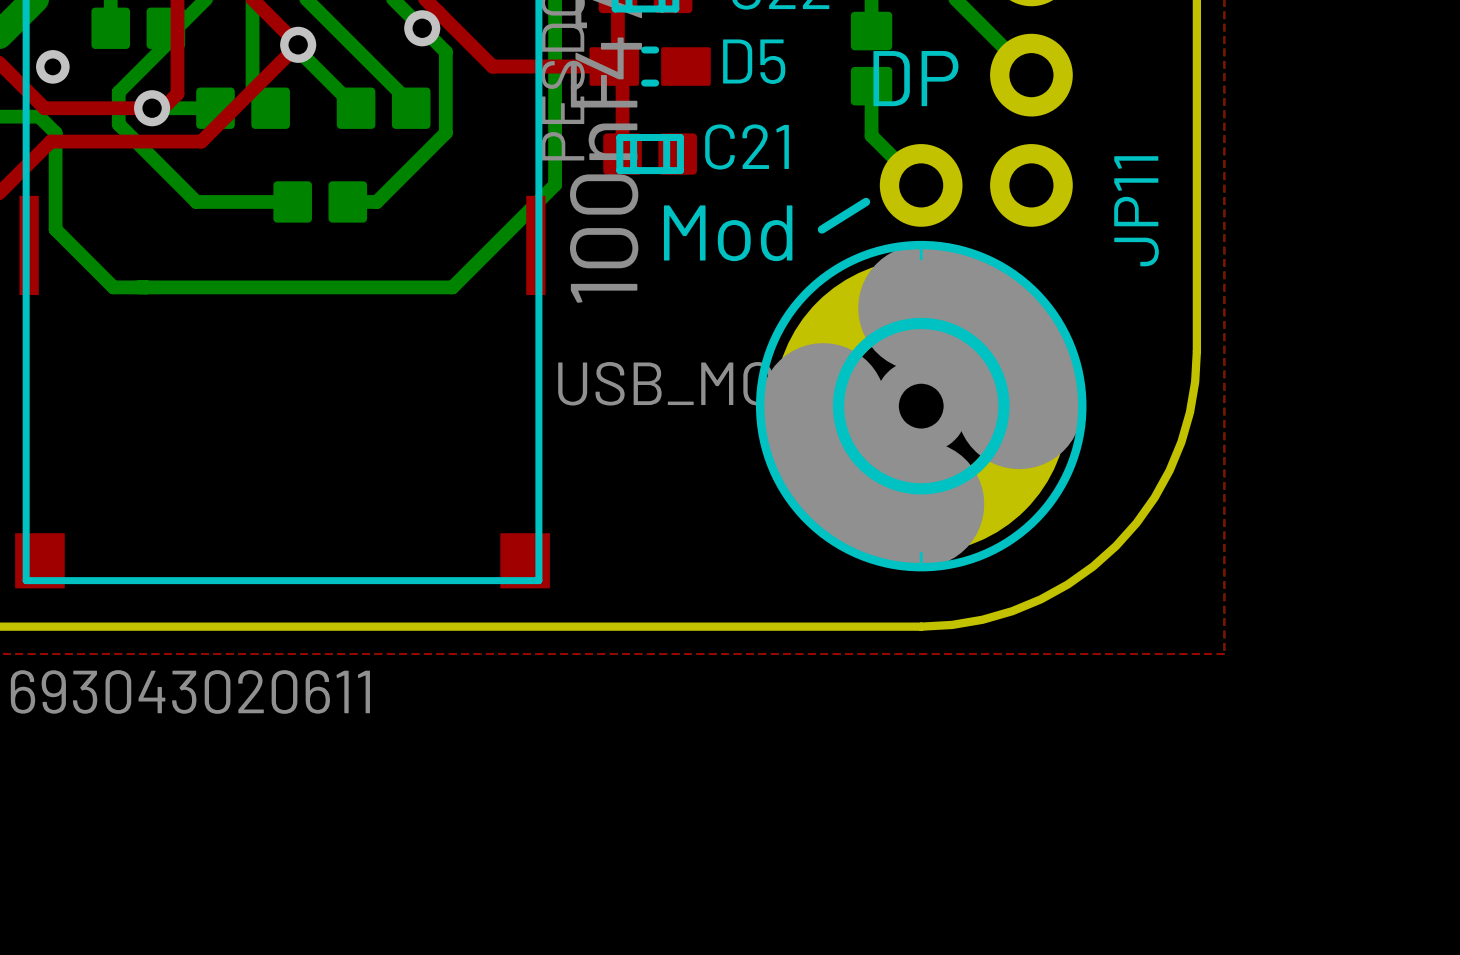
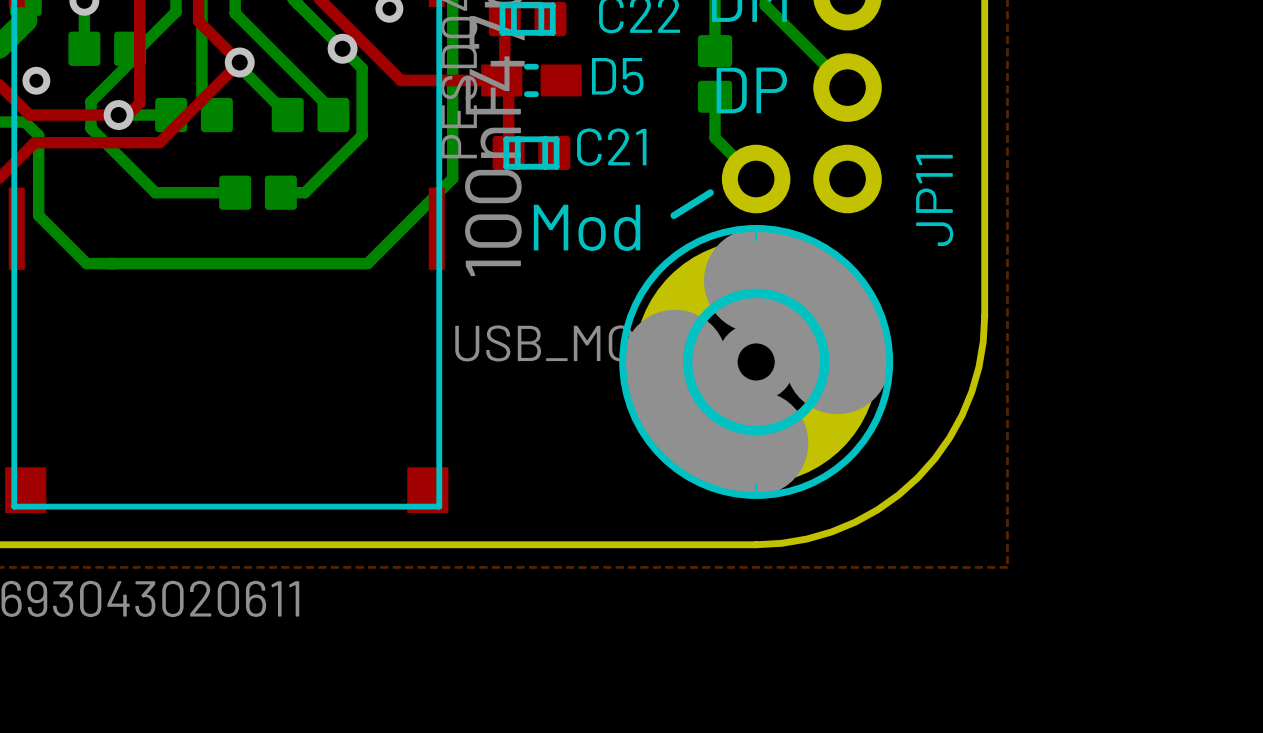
text position: Mod (728, 233) -> Mod (587, 227)

